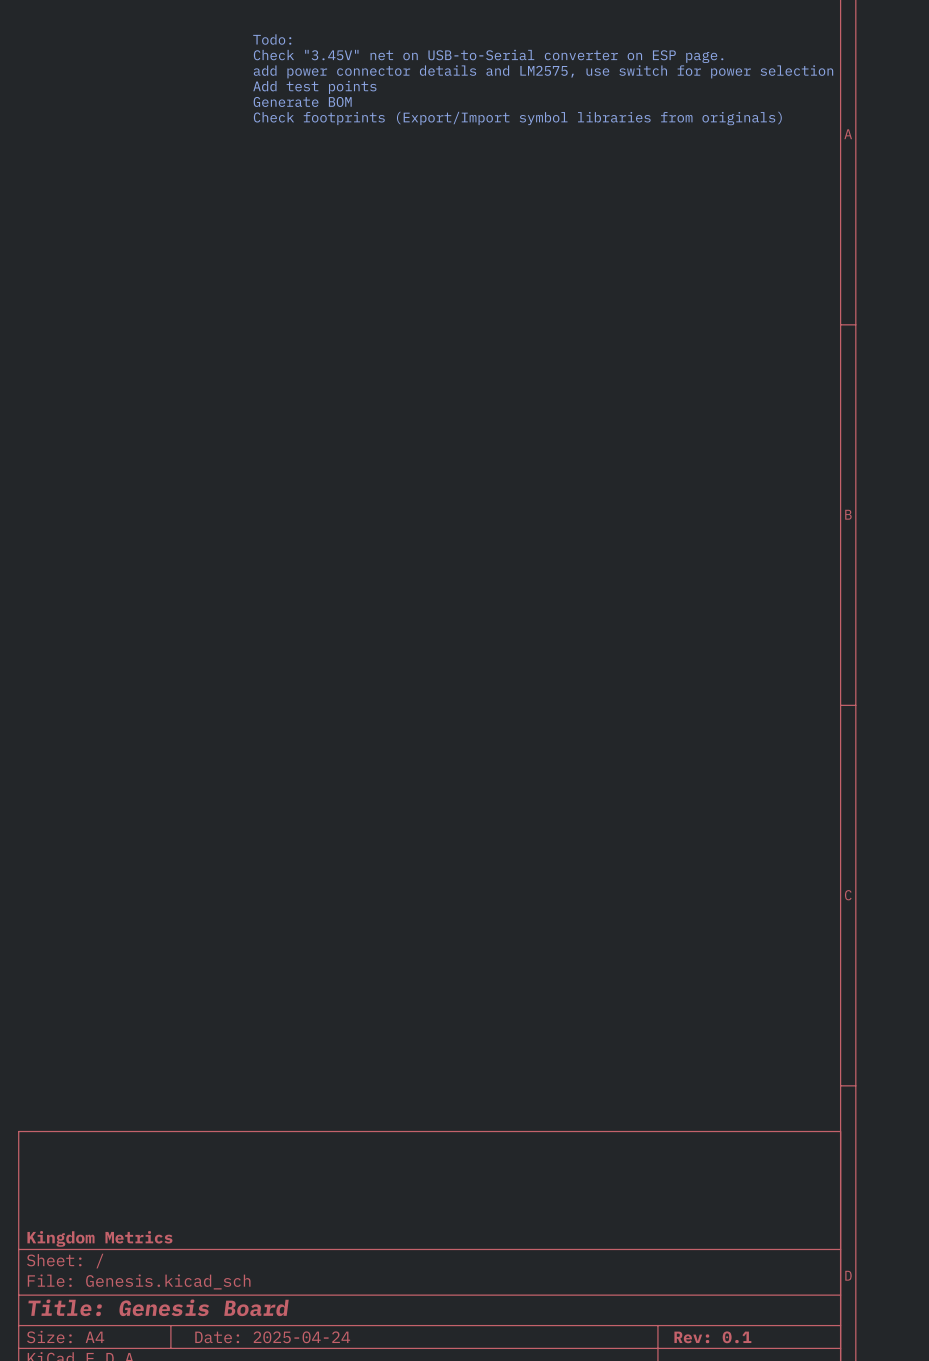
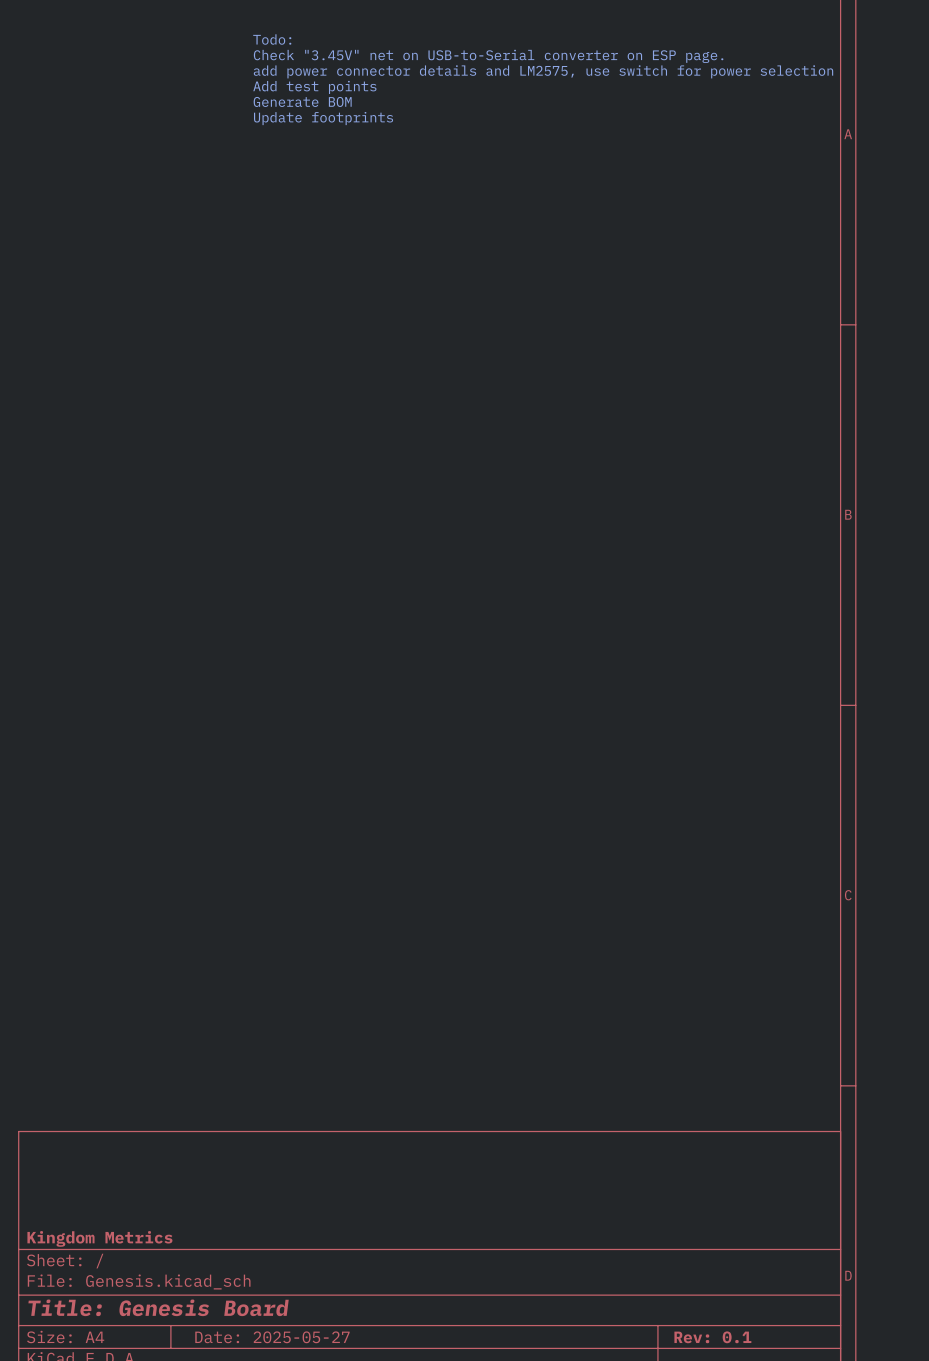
text: Check footprints (Export/Import symbol libraries from originals) (517, 118) -> Update footprints (323, 118)
title block: Date: 2025-04-24 (272, 1337) -> Date: 2025-05-27 (272, 1337)

